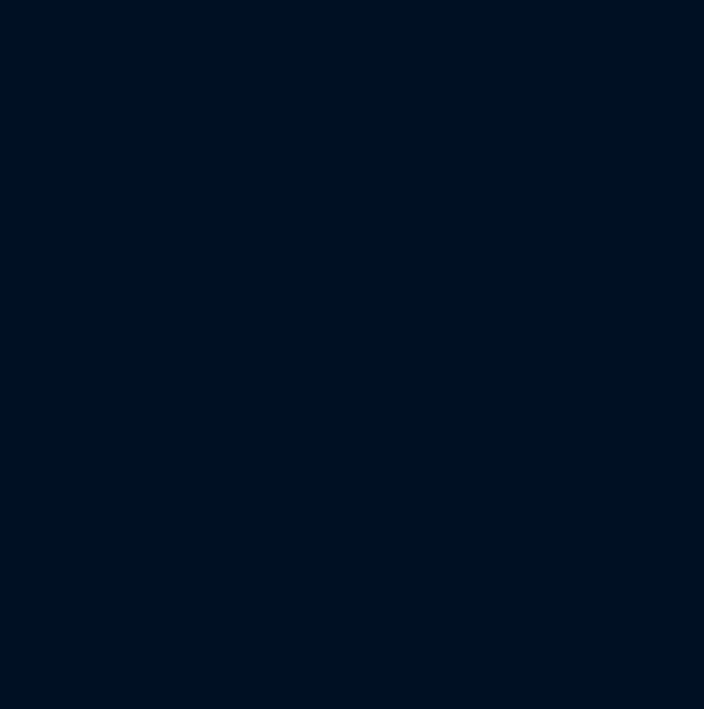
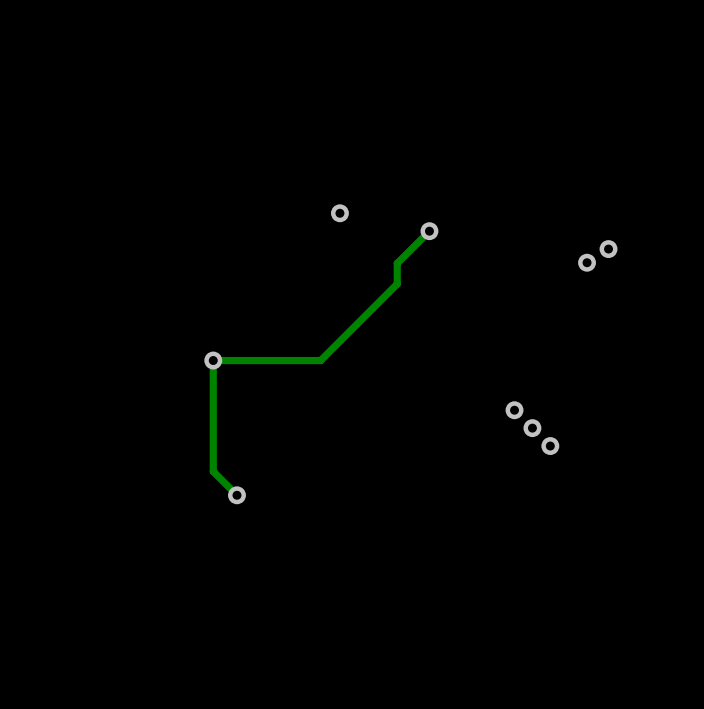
via: none -> (339, 213)
track: none -> (429, 231) (397, 263) (397, 283) (320, 360) (213, 360) (213, 471) (236, 495)
via: none -> (429, 231)
via: none -> (608, 249)
via: none -> (587, 262)
via: none -> (213, 360)
via: none -> (514, 410)
via: none -> (532, 428)
via: none -> (550, 446)
via: none -> (236, 495)

